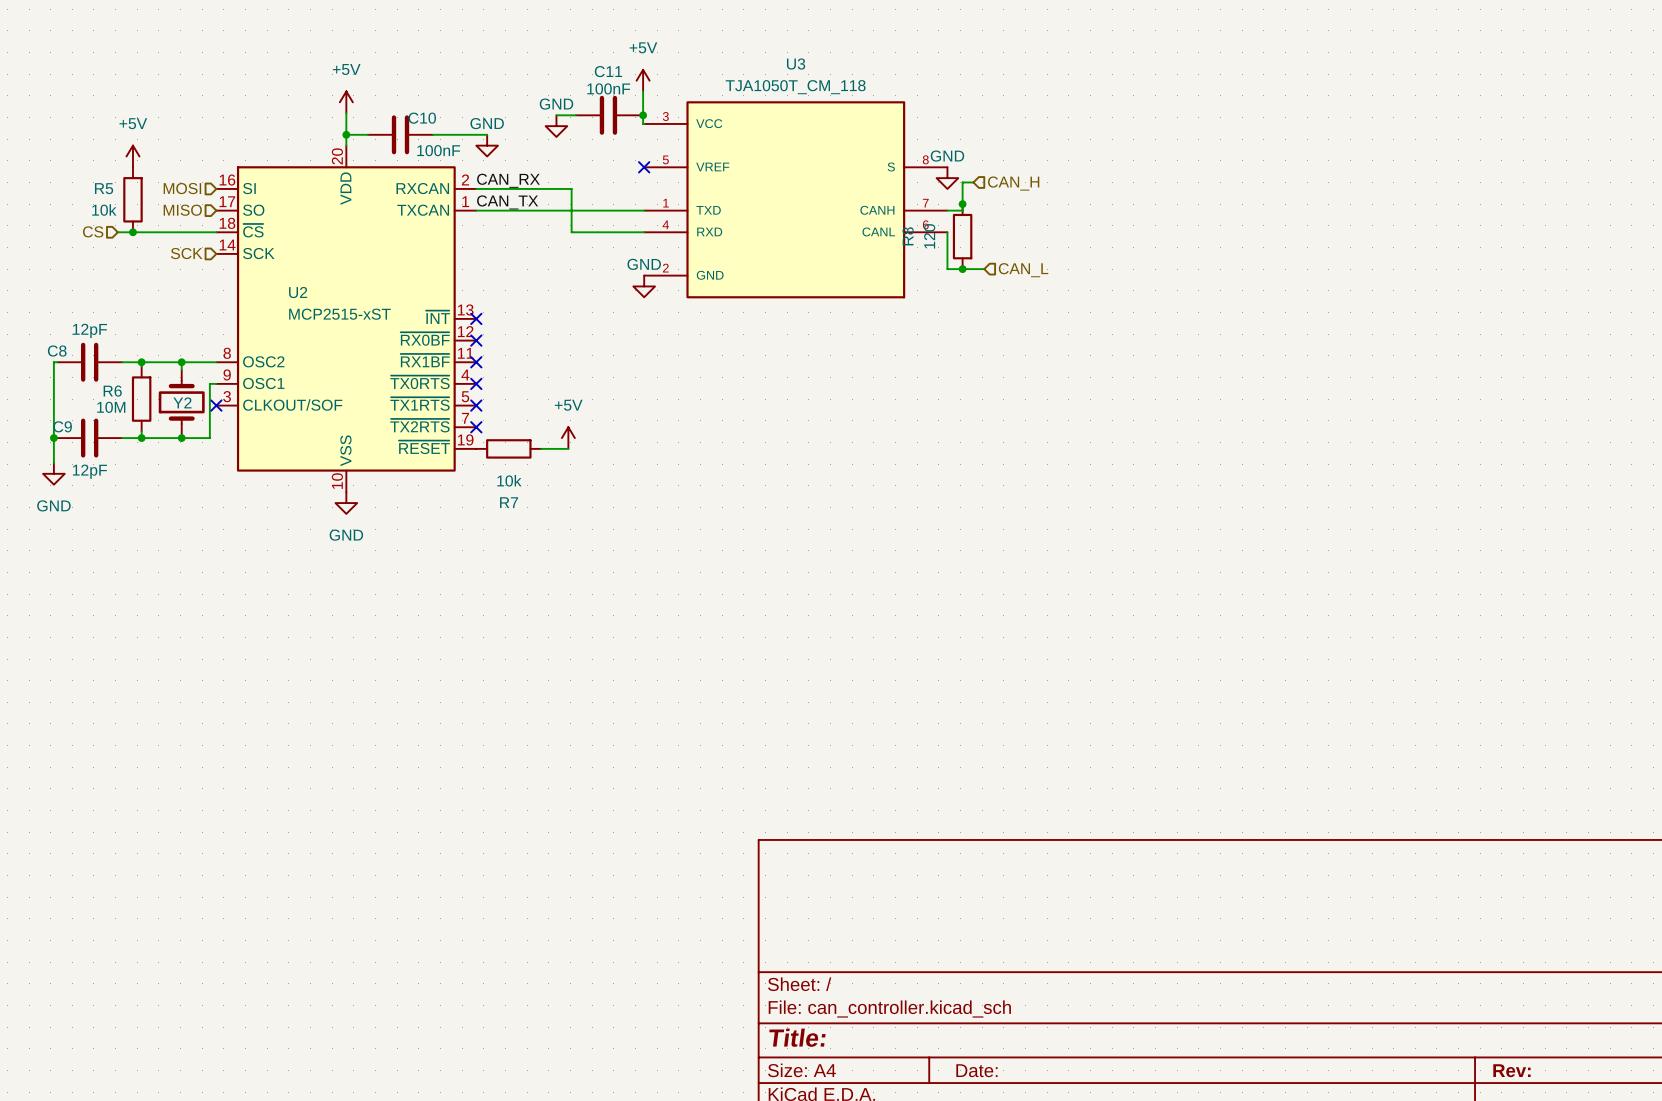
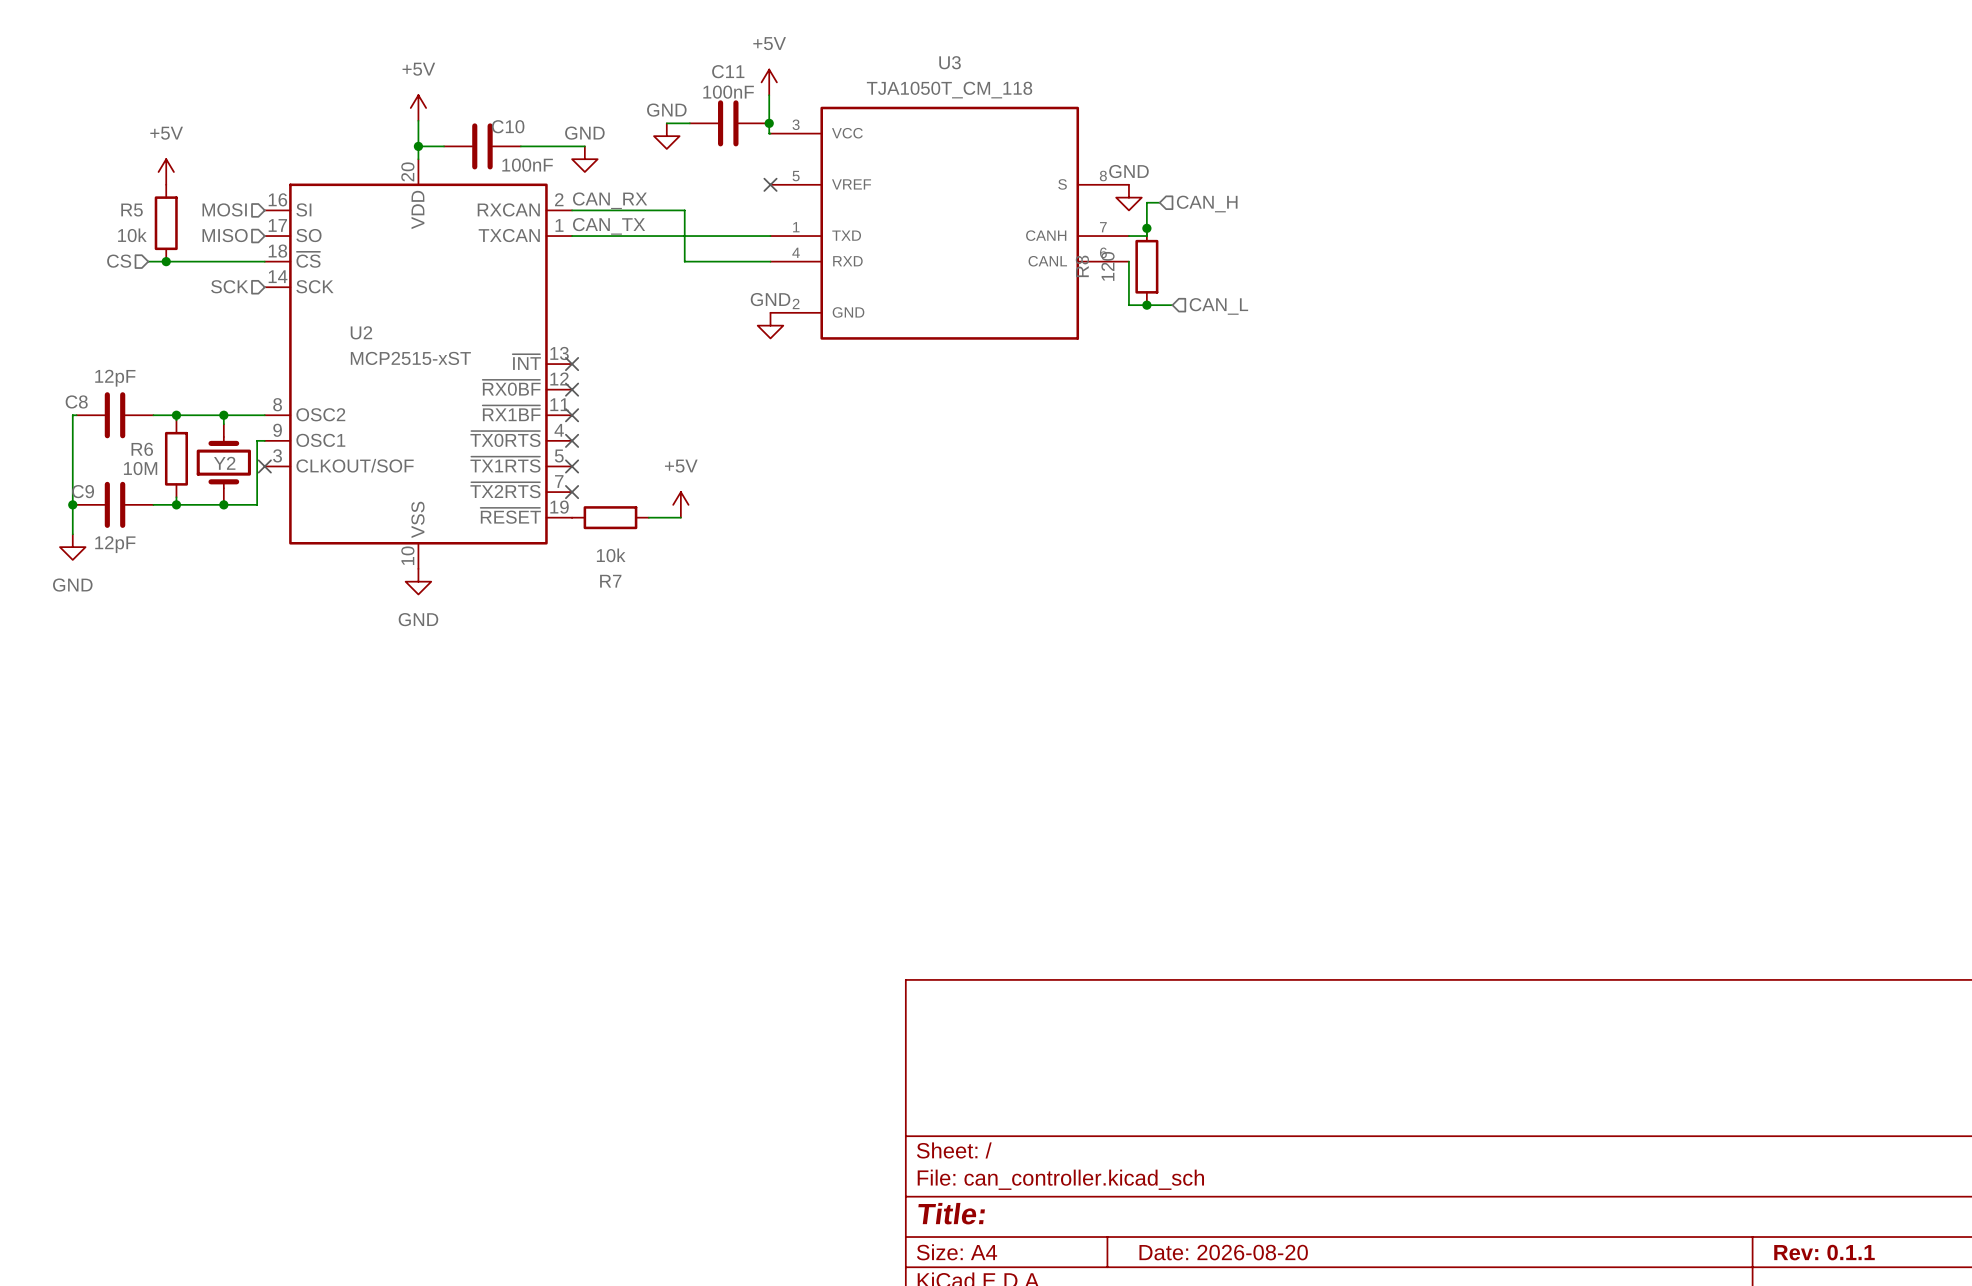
title block: Date: (976, 1070) -> Date: 2026-08-20 (1223, 1252)
title block: Rev: (1511, 1070) -> Rev: 0.1.1 (1824, 1252)

